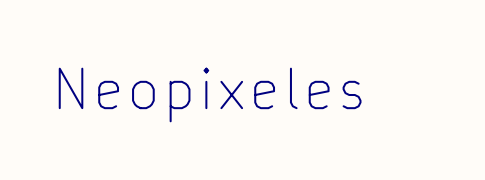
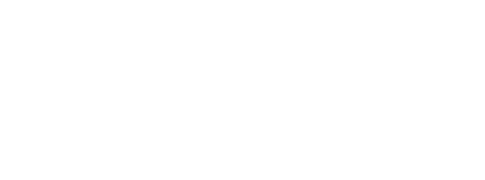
text: Neopixeles (210, 94) -> none

